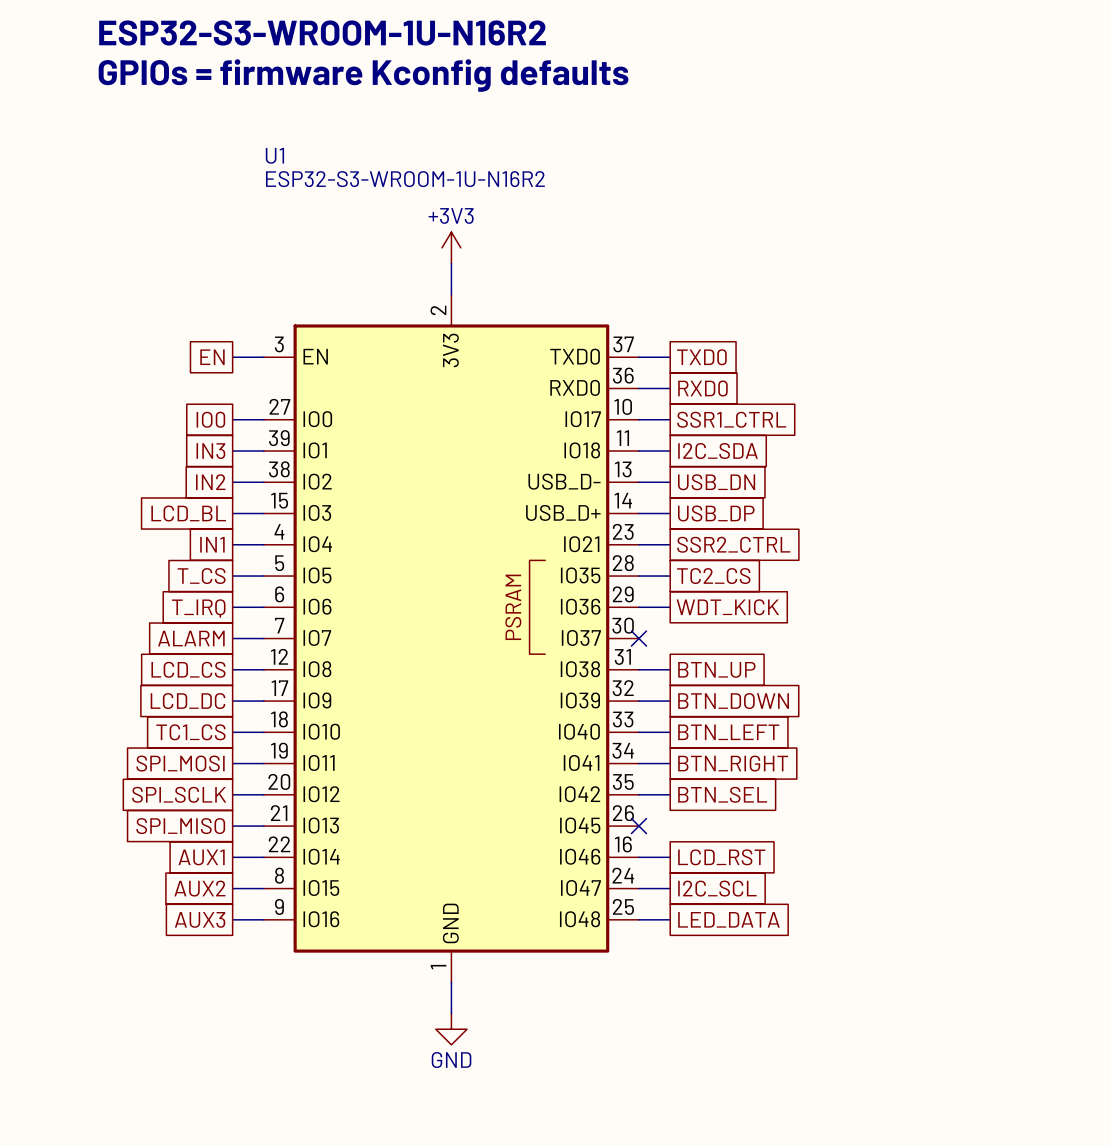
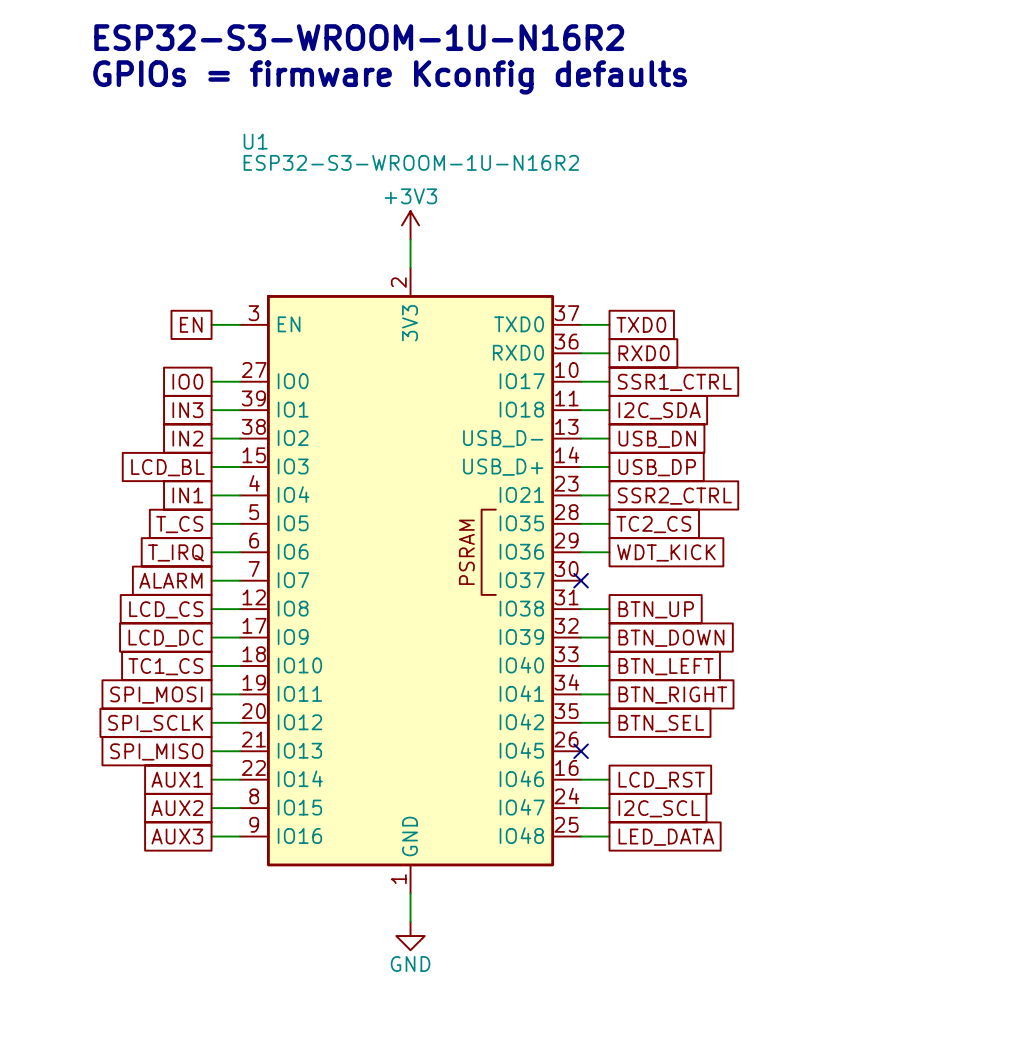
text position: ESP32-S3-WROOM-1U-N16R2 (322, 33) -> ESP32-S3-WROOM-1U-N16R2 (359, 37)
text position: GPIOs = firmware Kconfig defaults (363, 75) -> GPIOs = firmware Kconfig defaults (390, 77)

